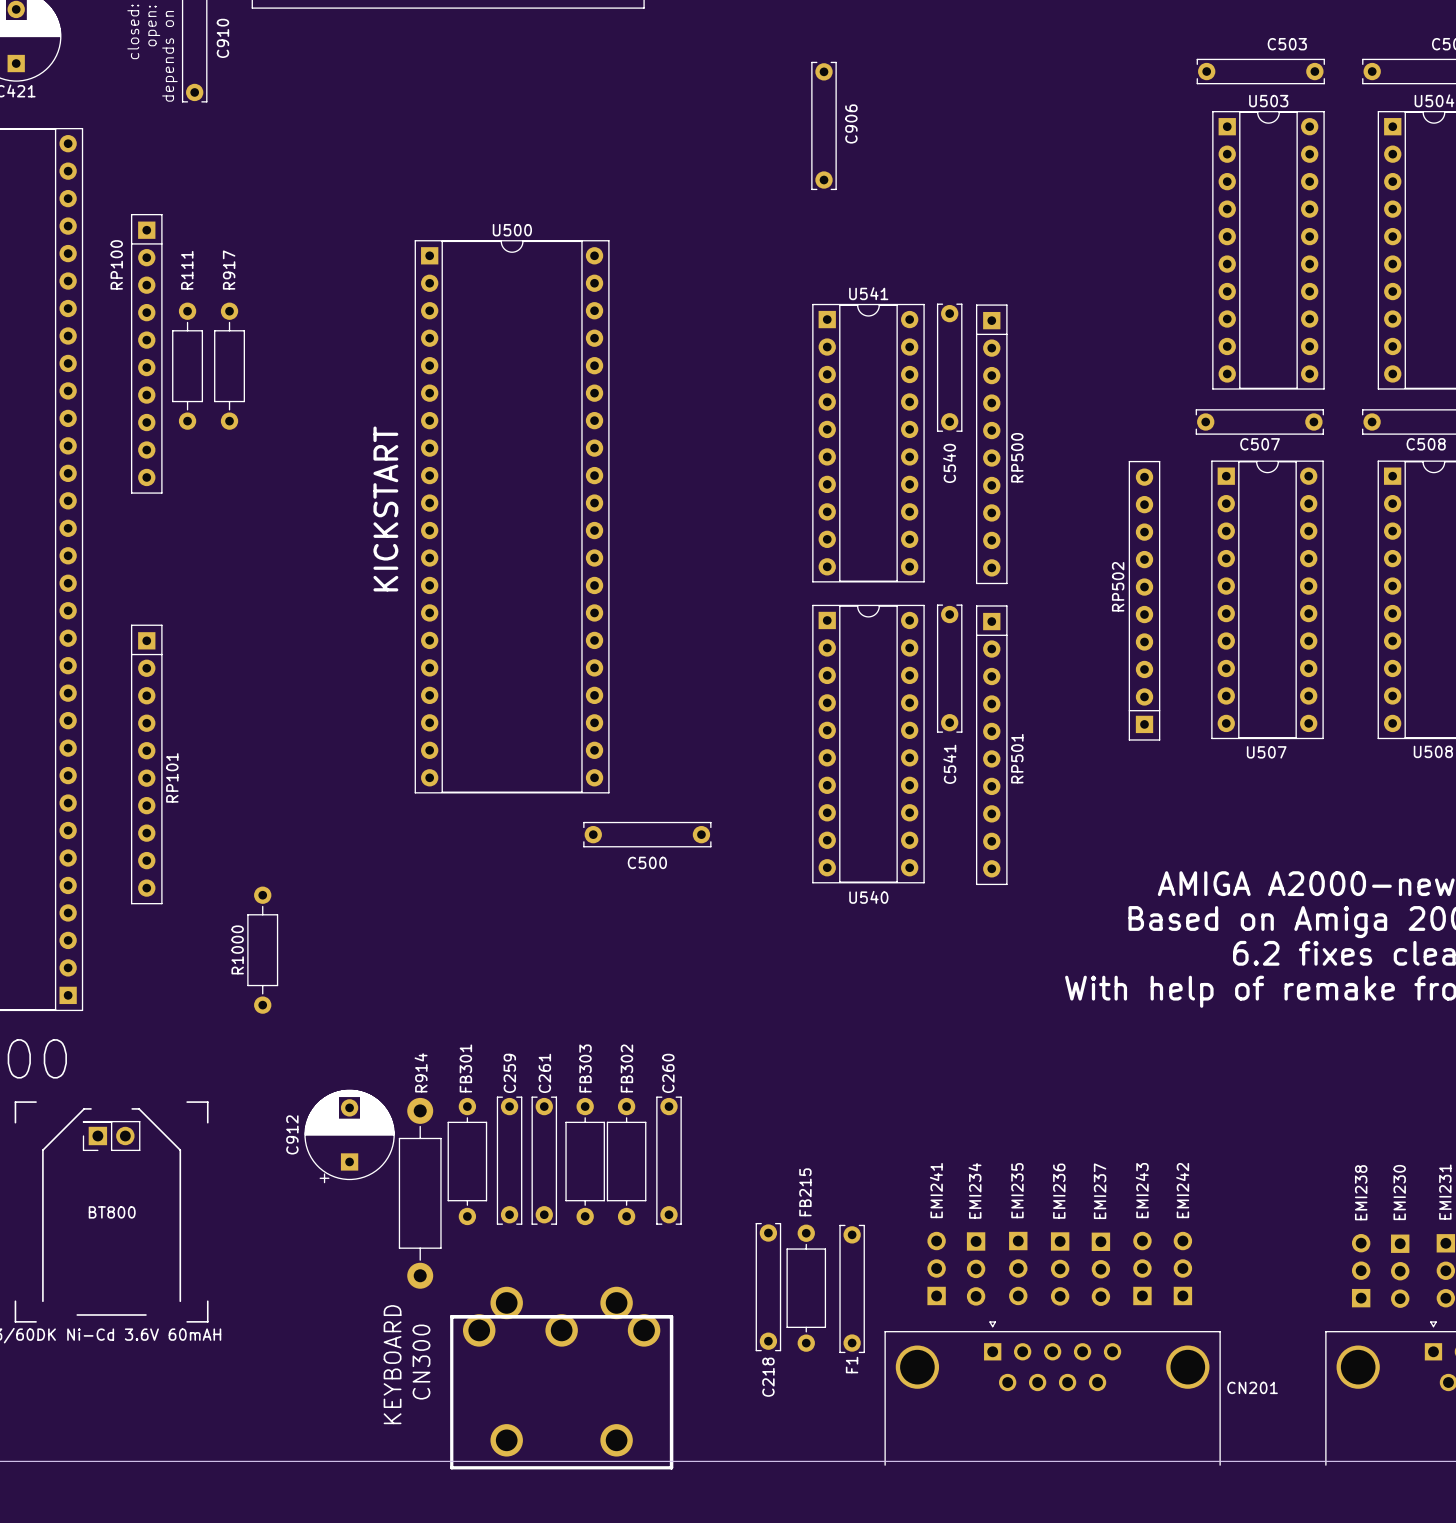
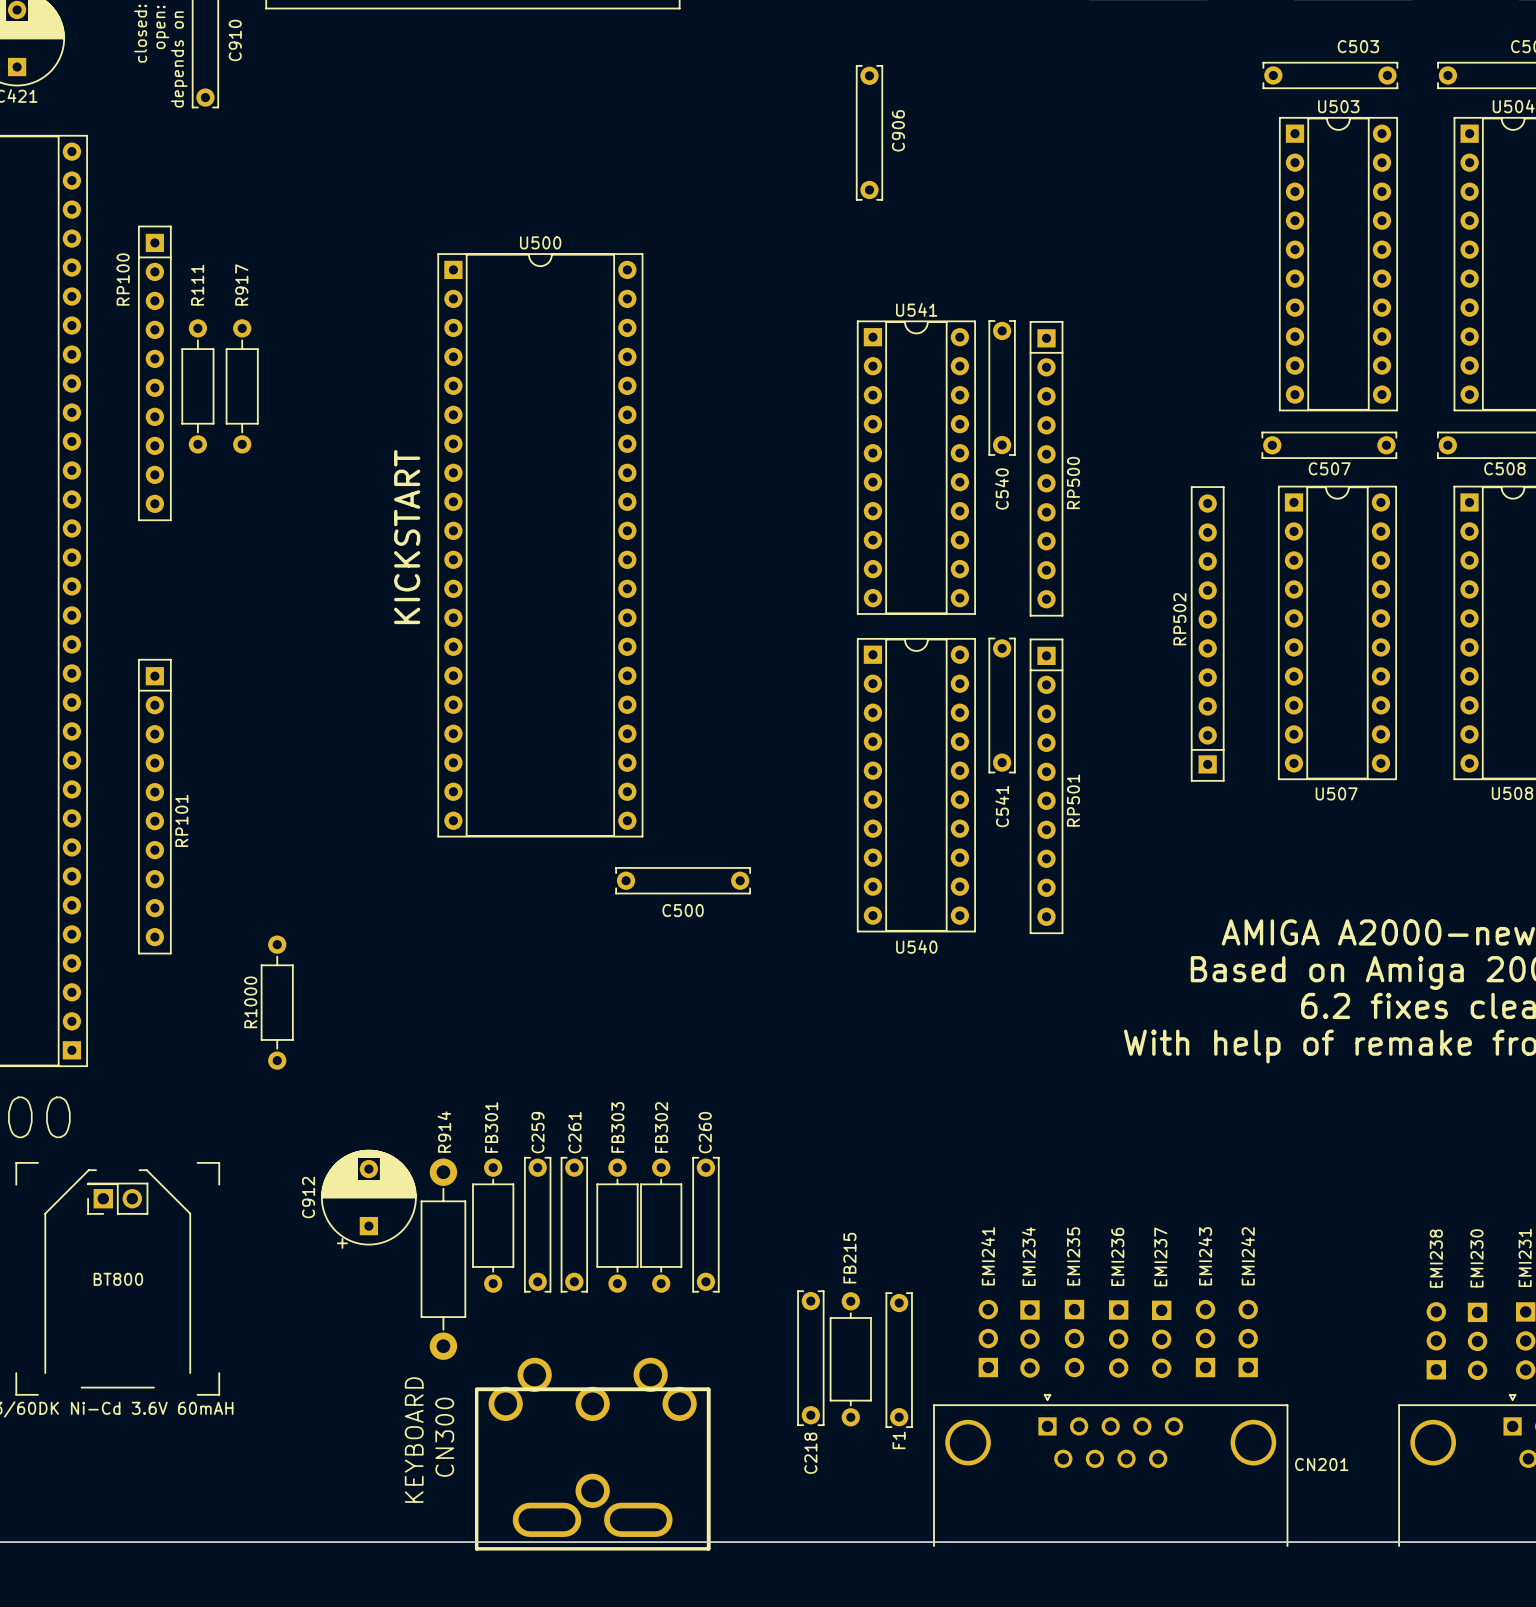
CN300 footprint: [450, 1286, 674, 1470] -> [474, 1357, 711, 1551]

